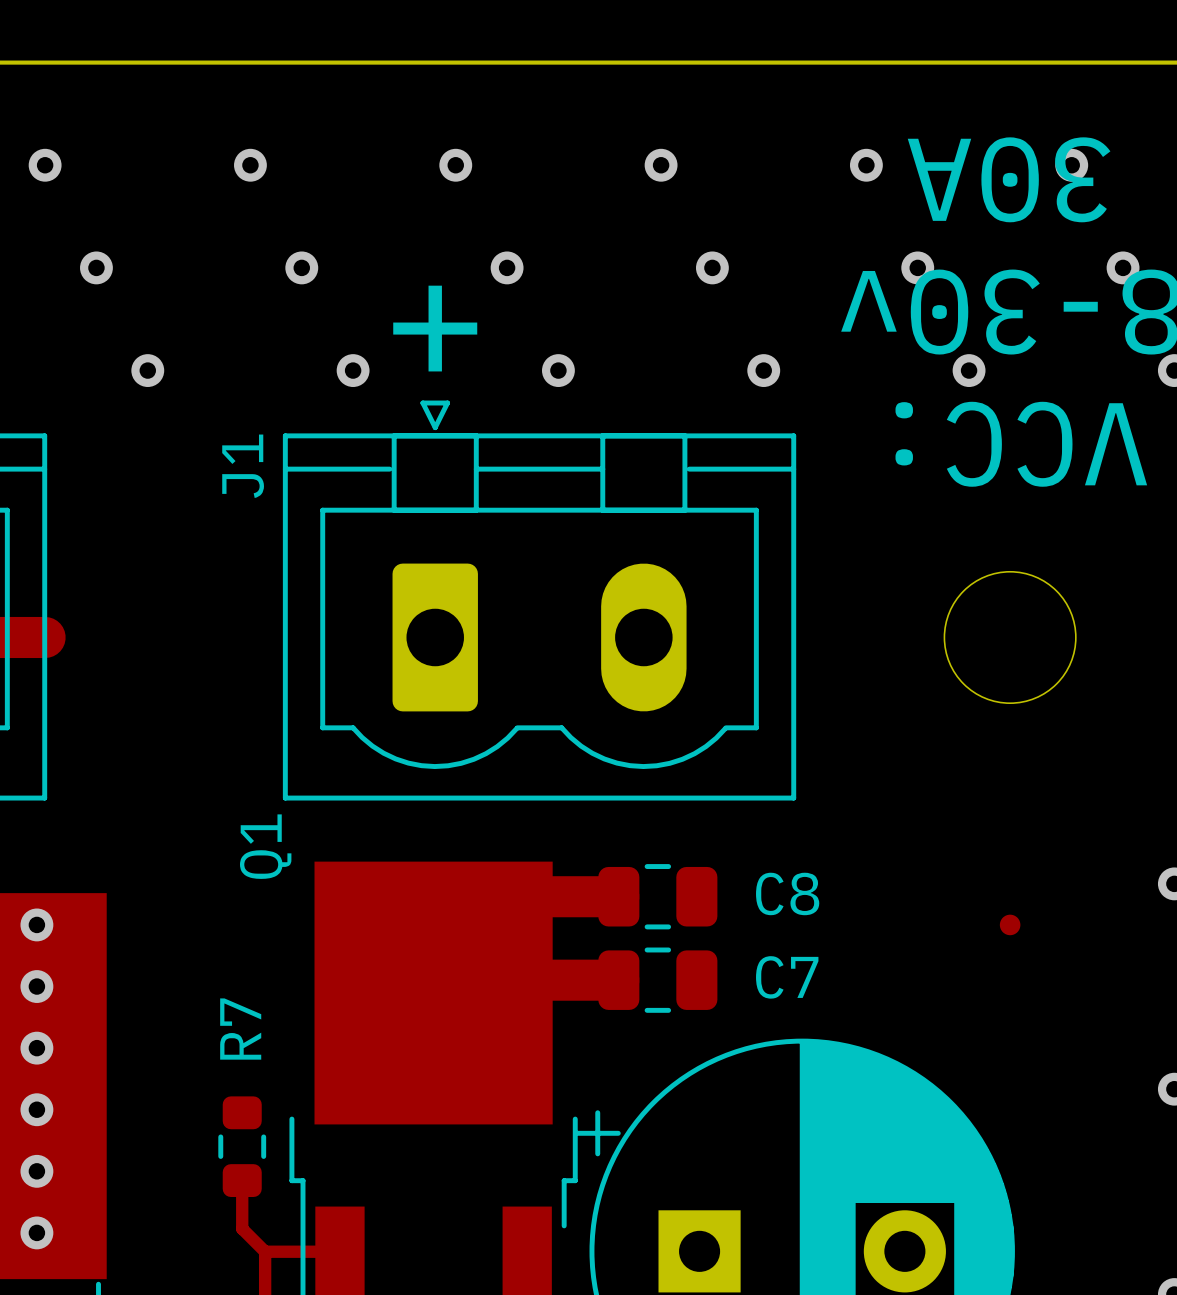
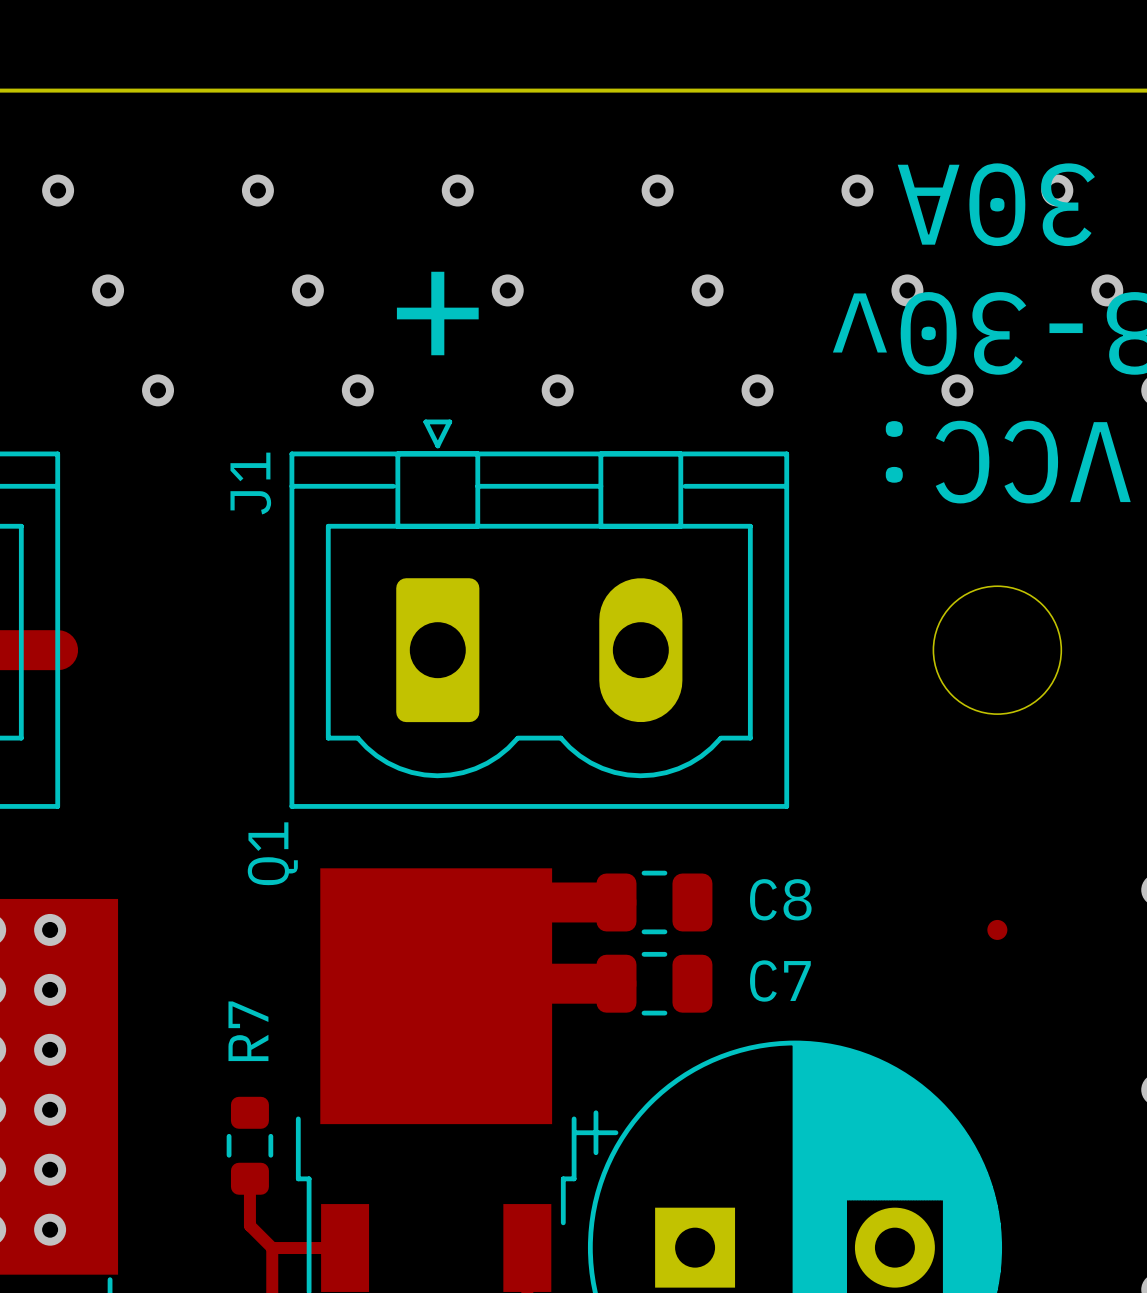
text position: + (435, 328) -> + (437, 313)

